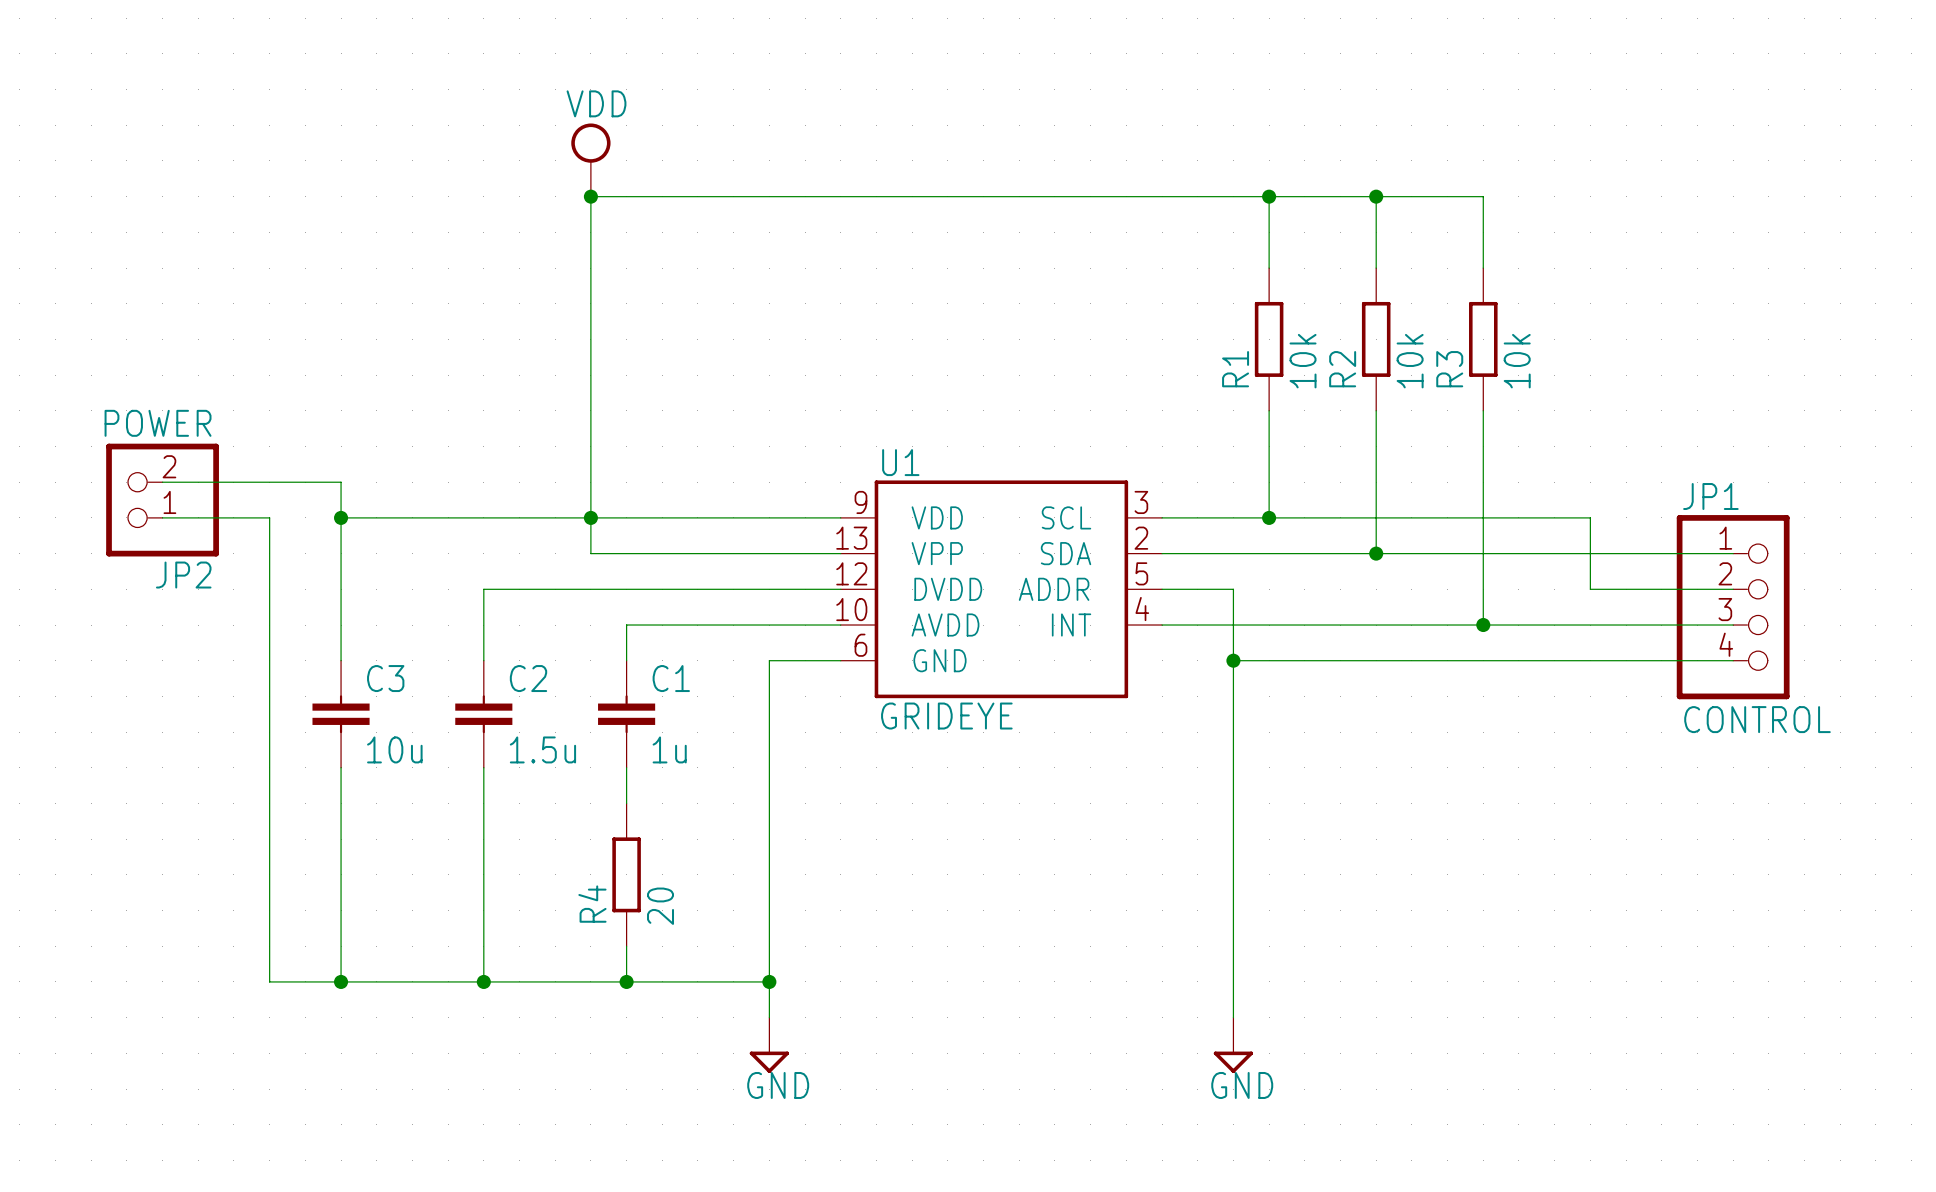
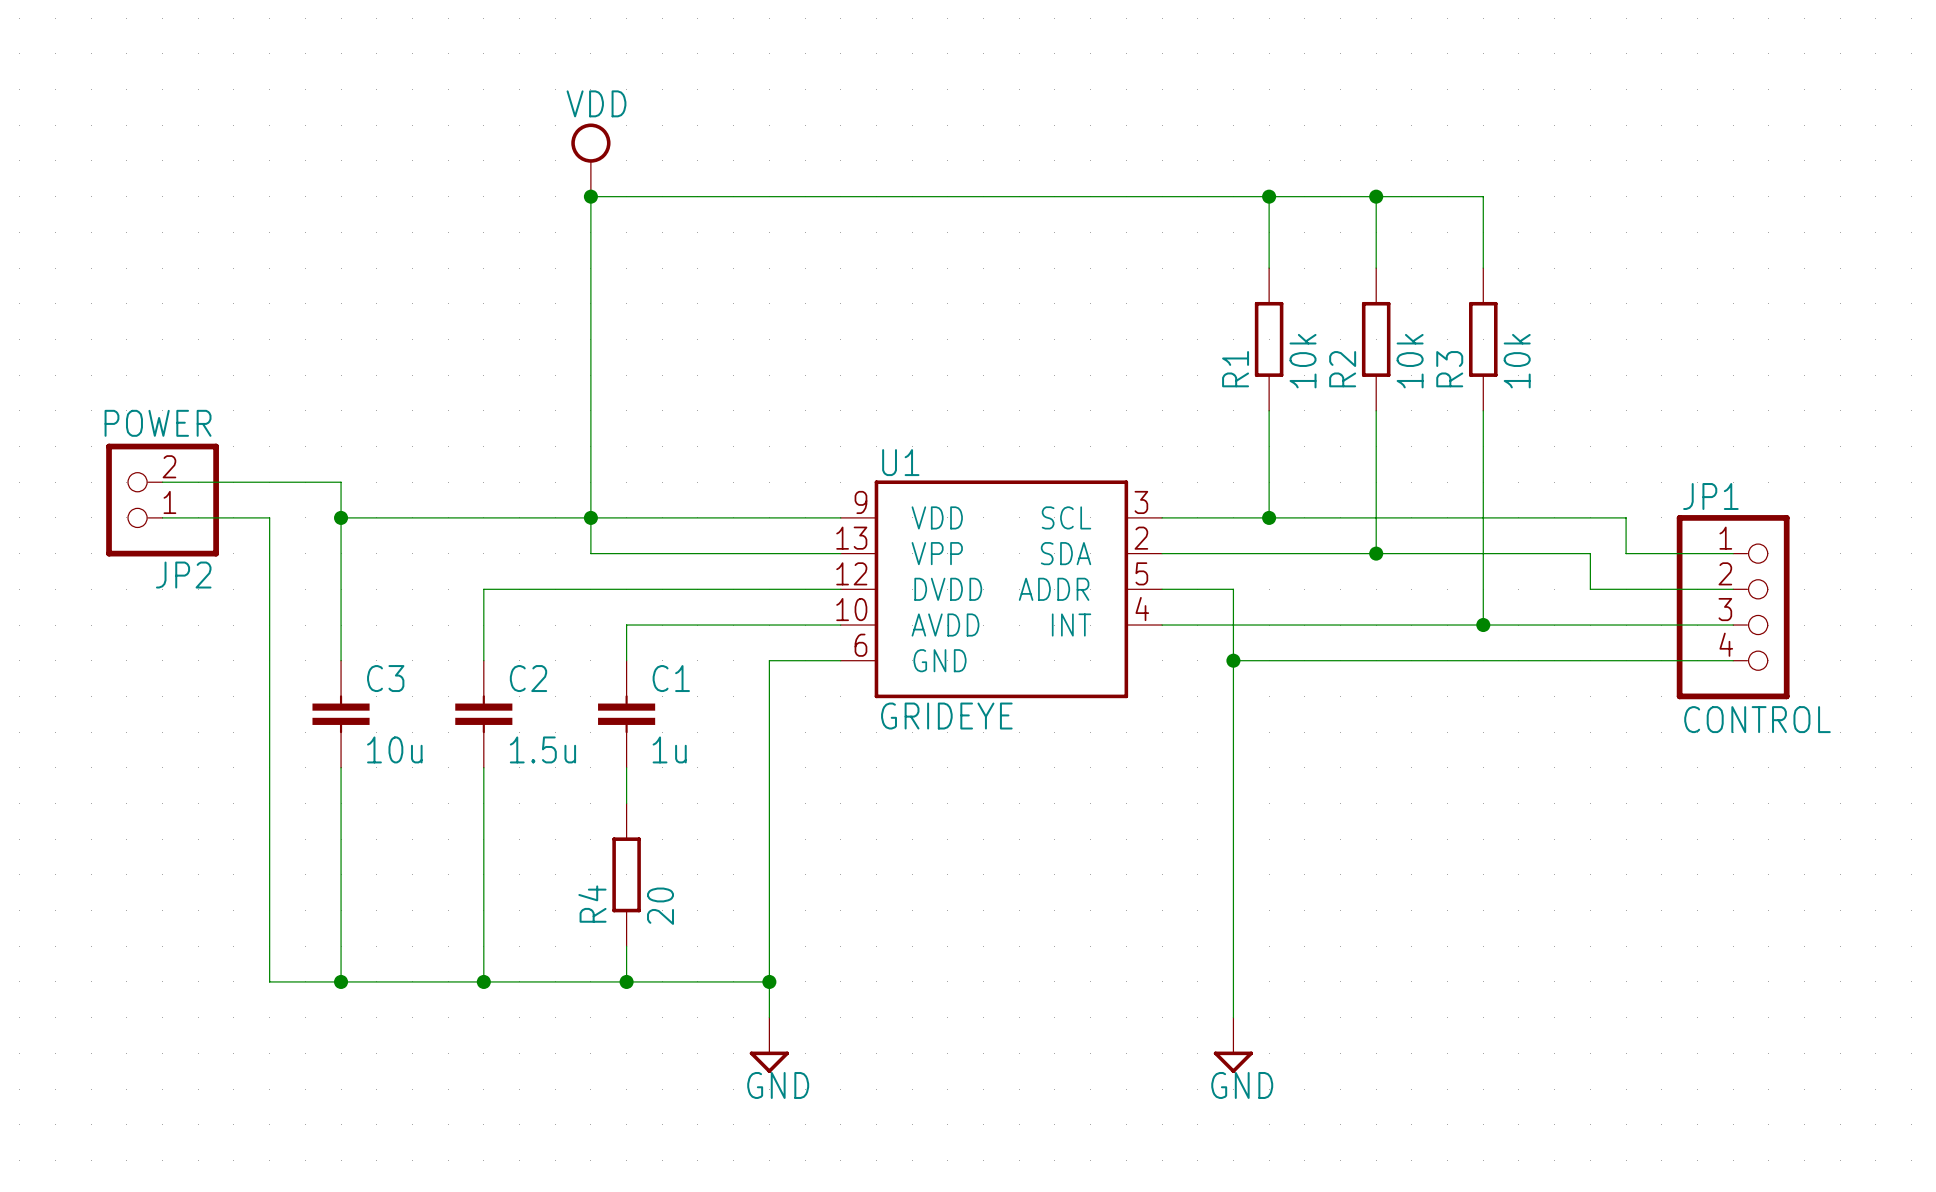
wire: (1590, 517) (1590, 553) (1626, 553) -> (1590, 517) (1626, 517) (1626, 553)

